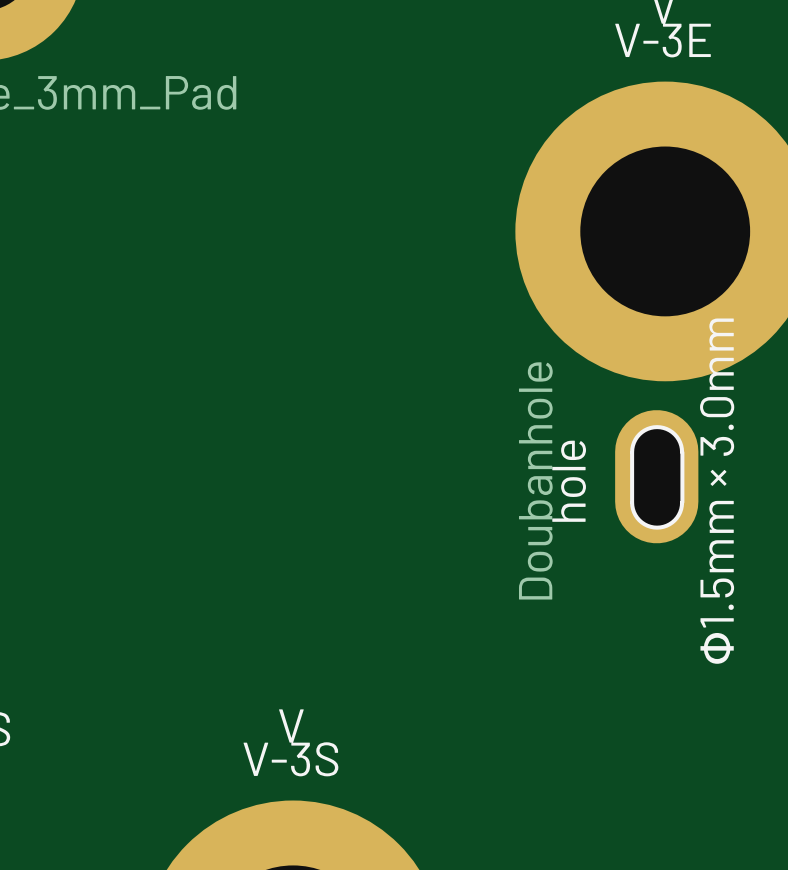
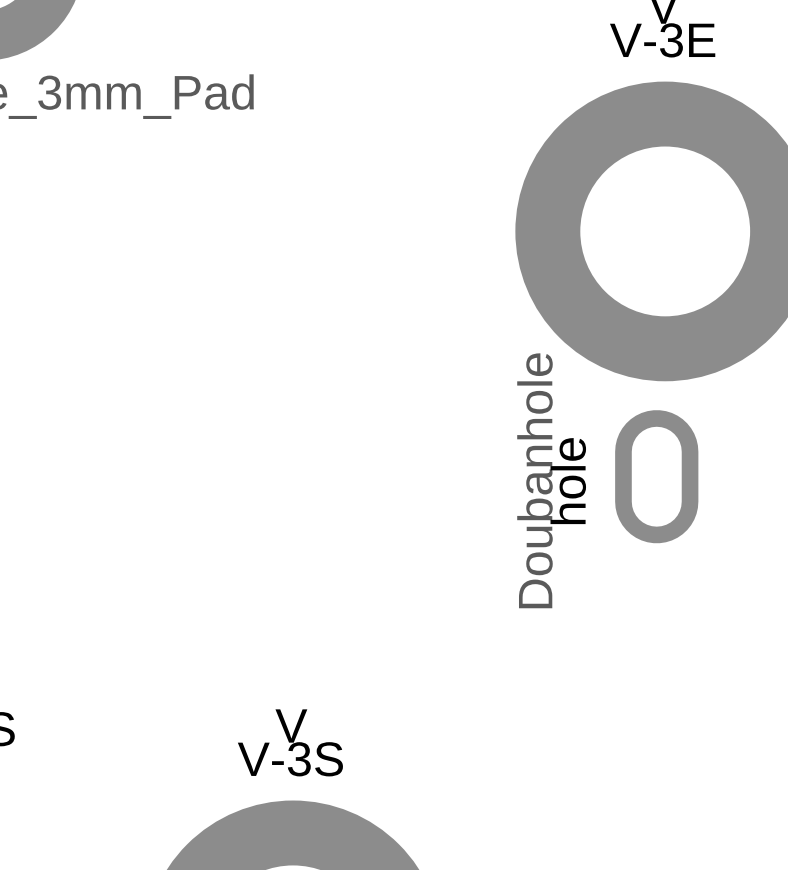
hole footprint: [615, 410, 699, 544] -> [615, 410, 699, 544]

